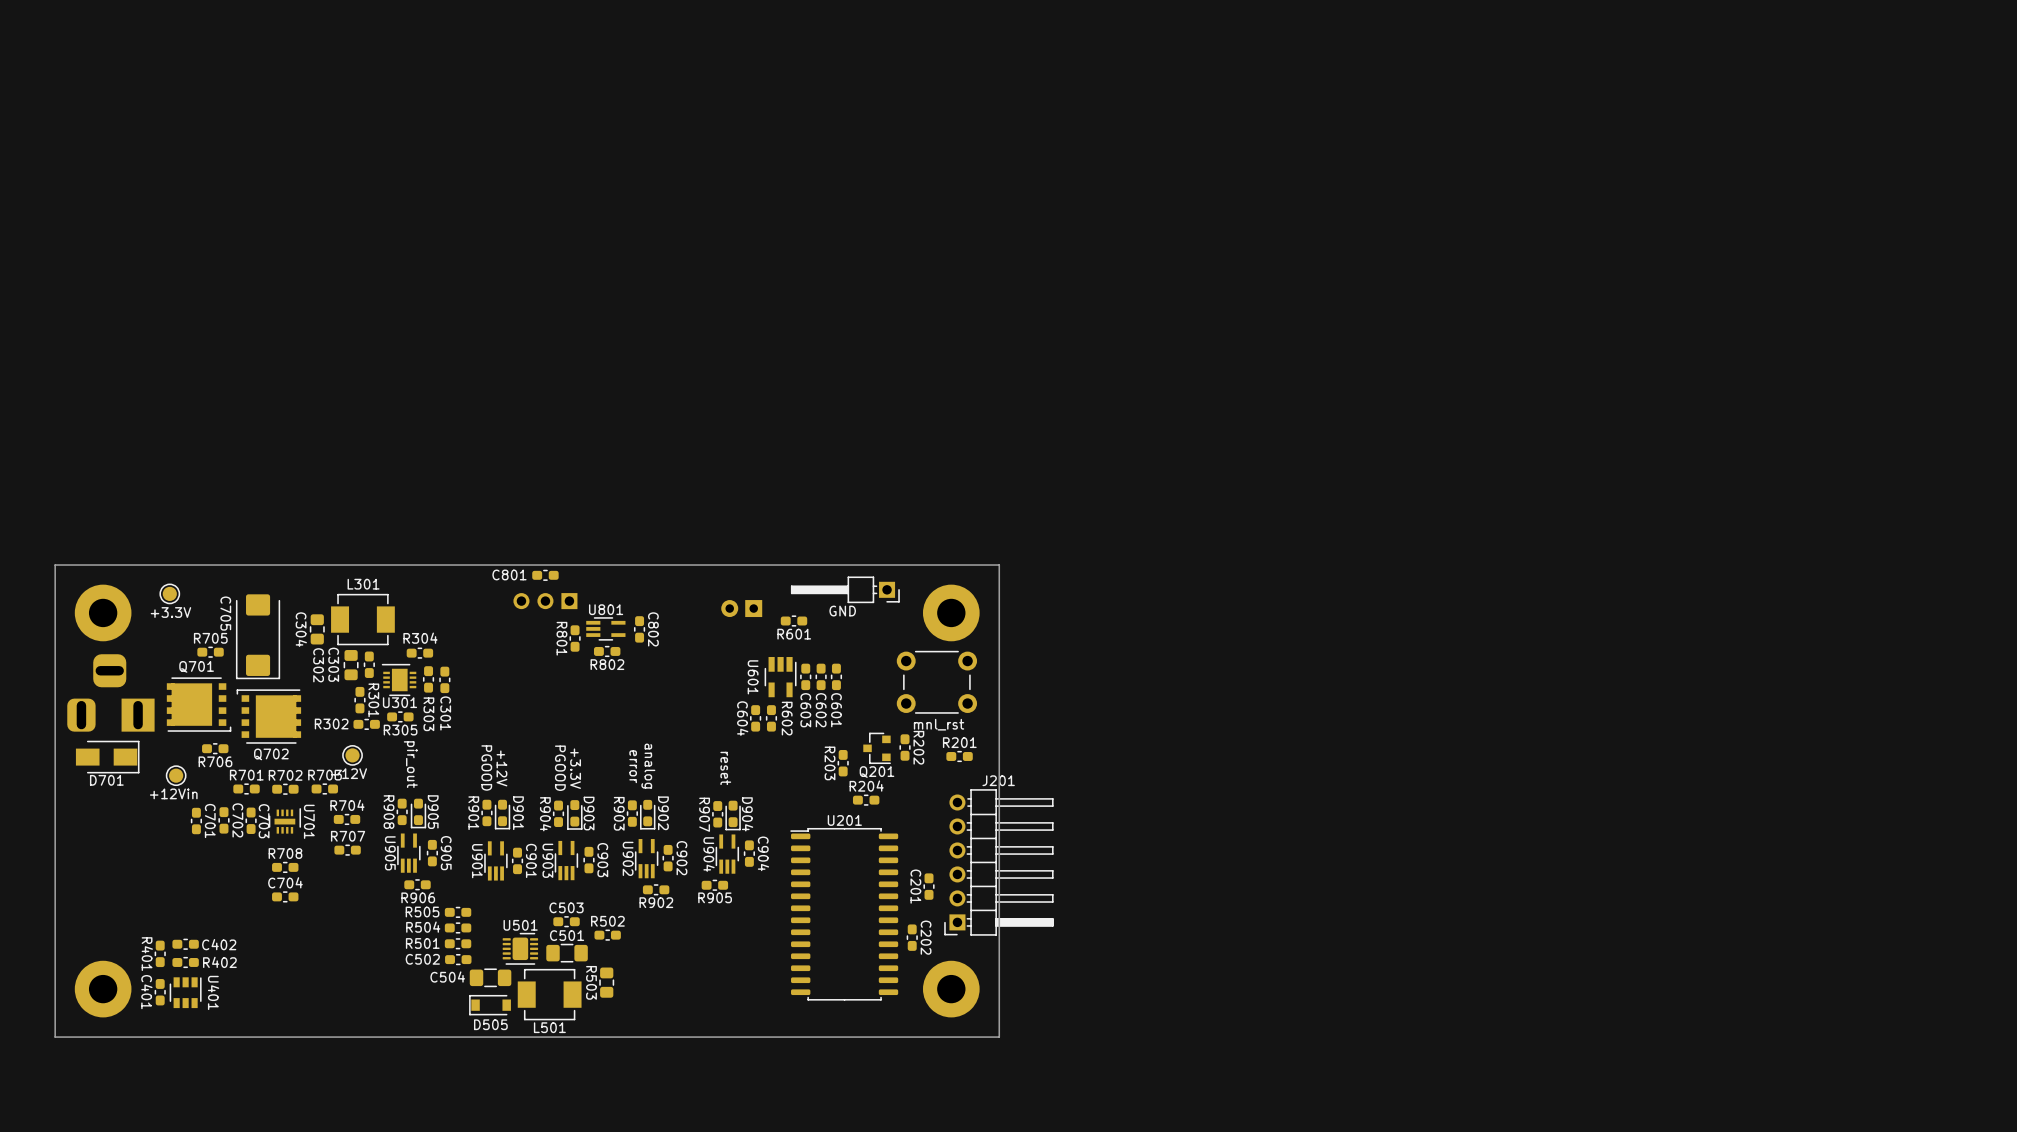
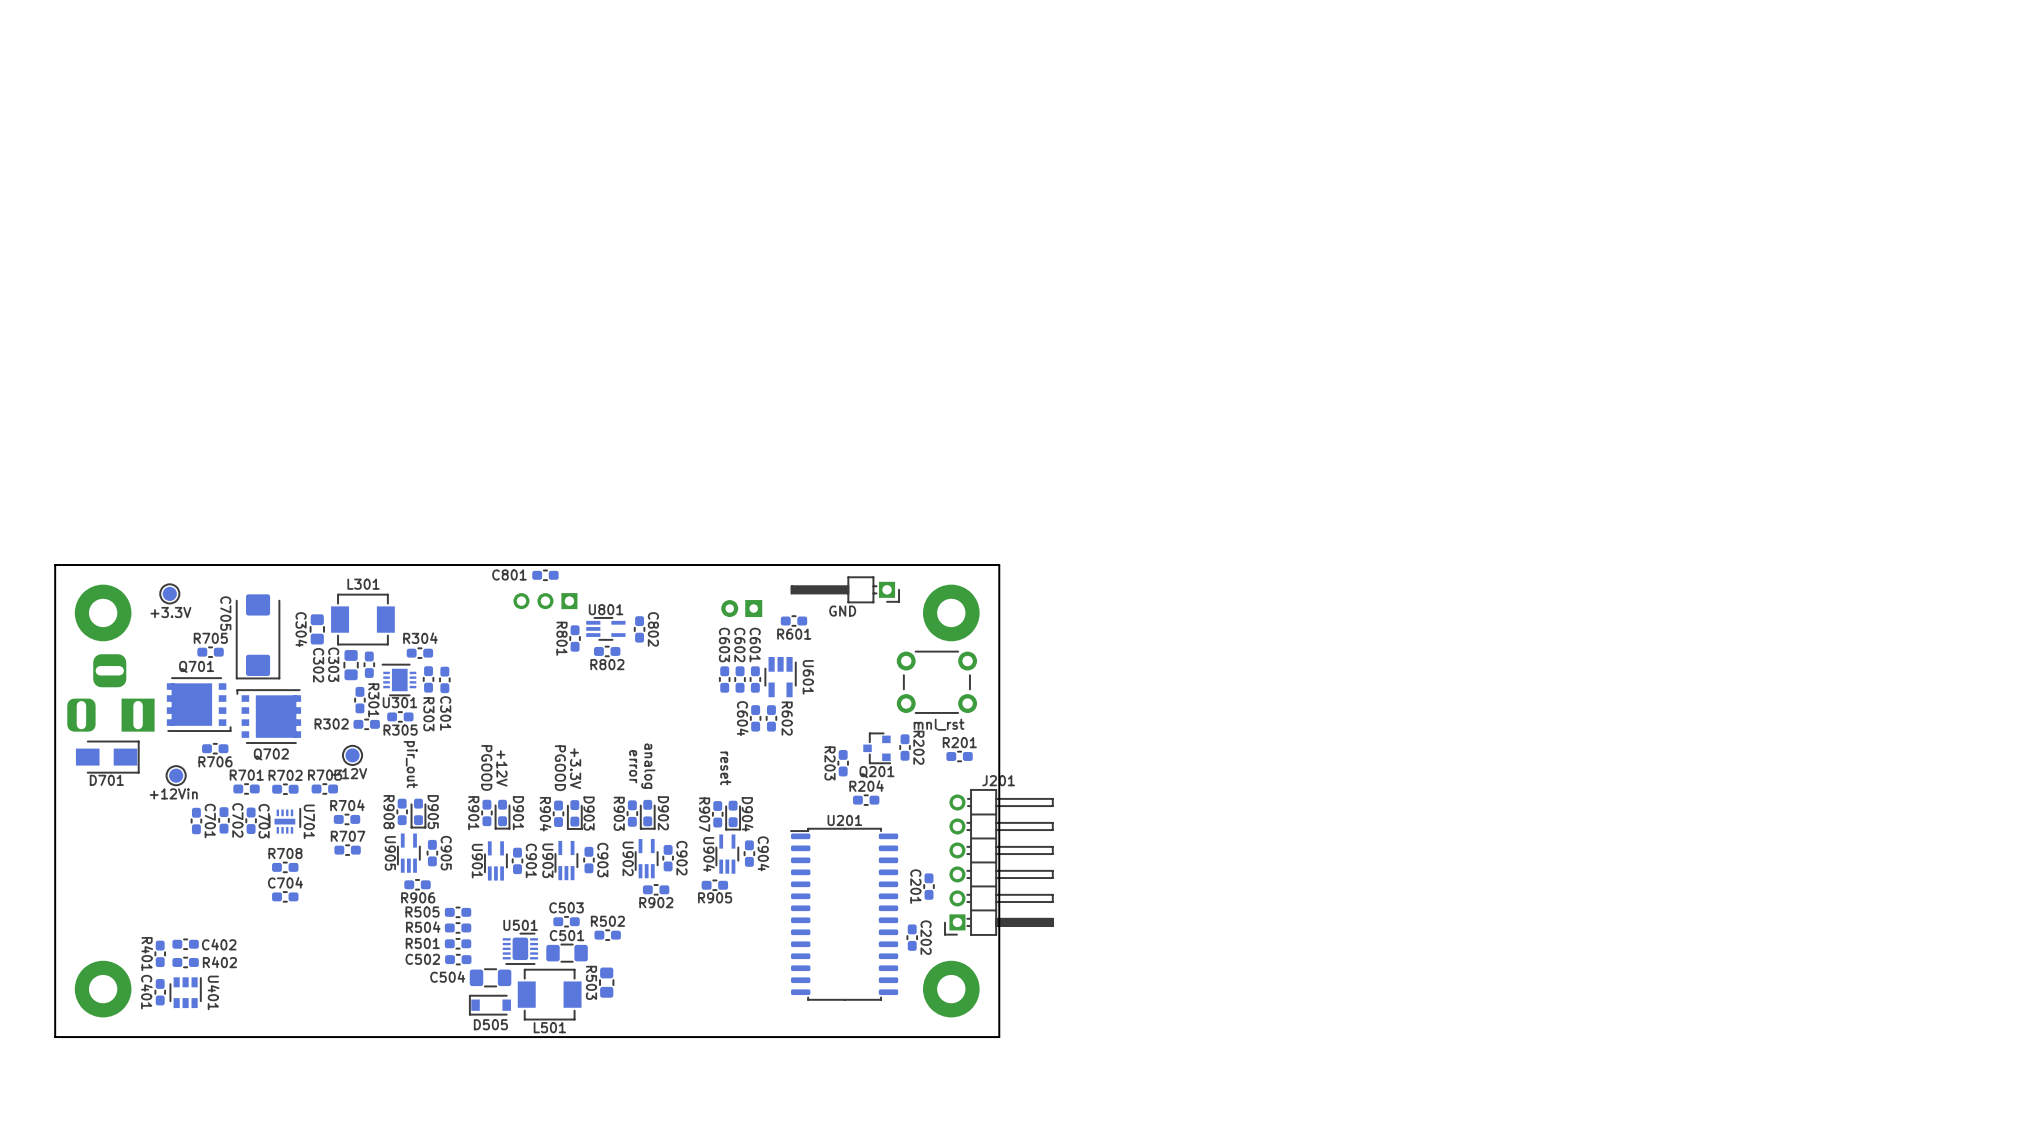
C603 position: (805, 676) -> (724, 679)
C602 position: (821, 676) -> (740, 679)
C601 position: (836, 676) -> (755, 679)
U601 name position: U601 (753, 677) -> U601 (808, 677)
C603 name position: C603 (805, 710) -> C603 (724, 644)
C602 name position: C602 (821, 710) -> C602 (739, 644)
C601 name position: C601 (836, 710) -> C601 (755, 644)

